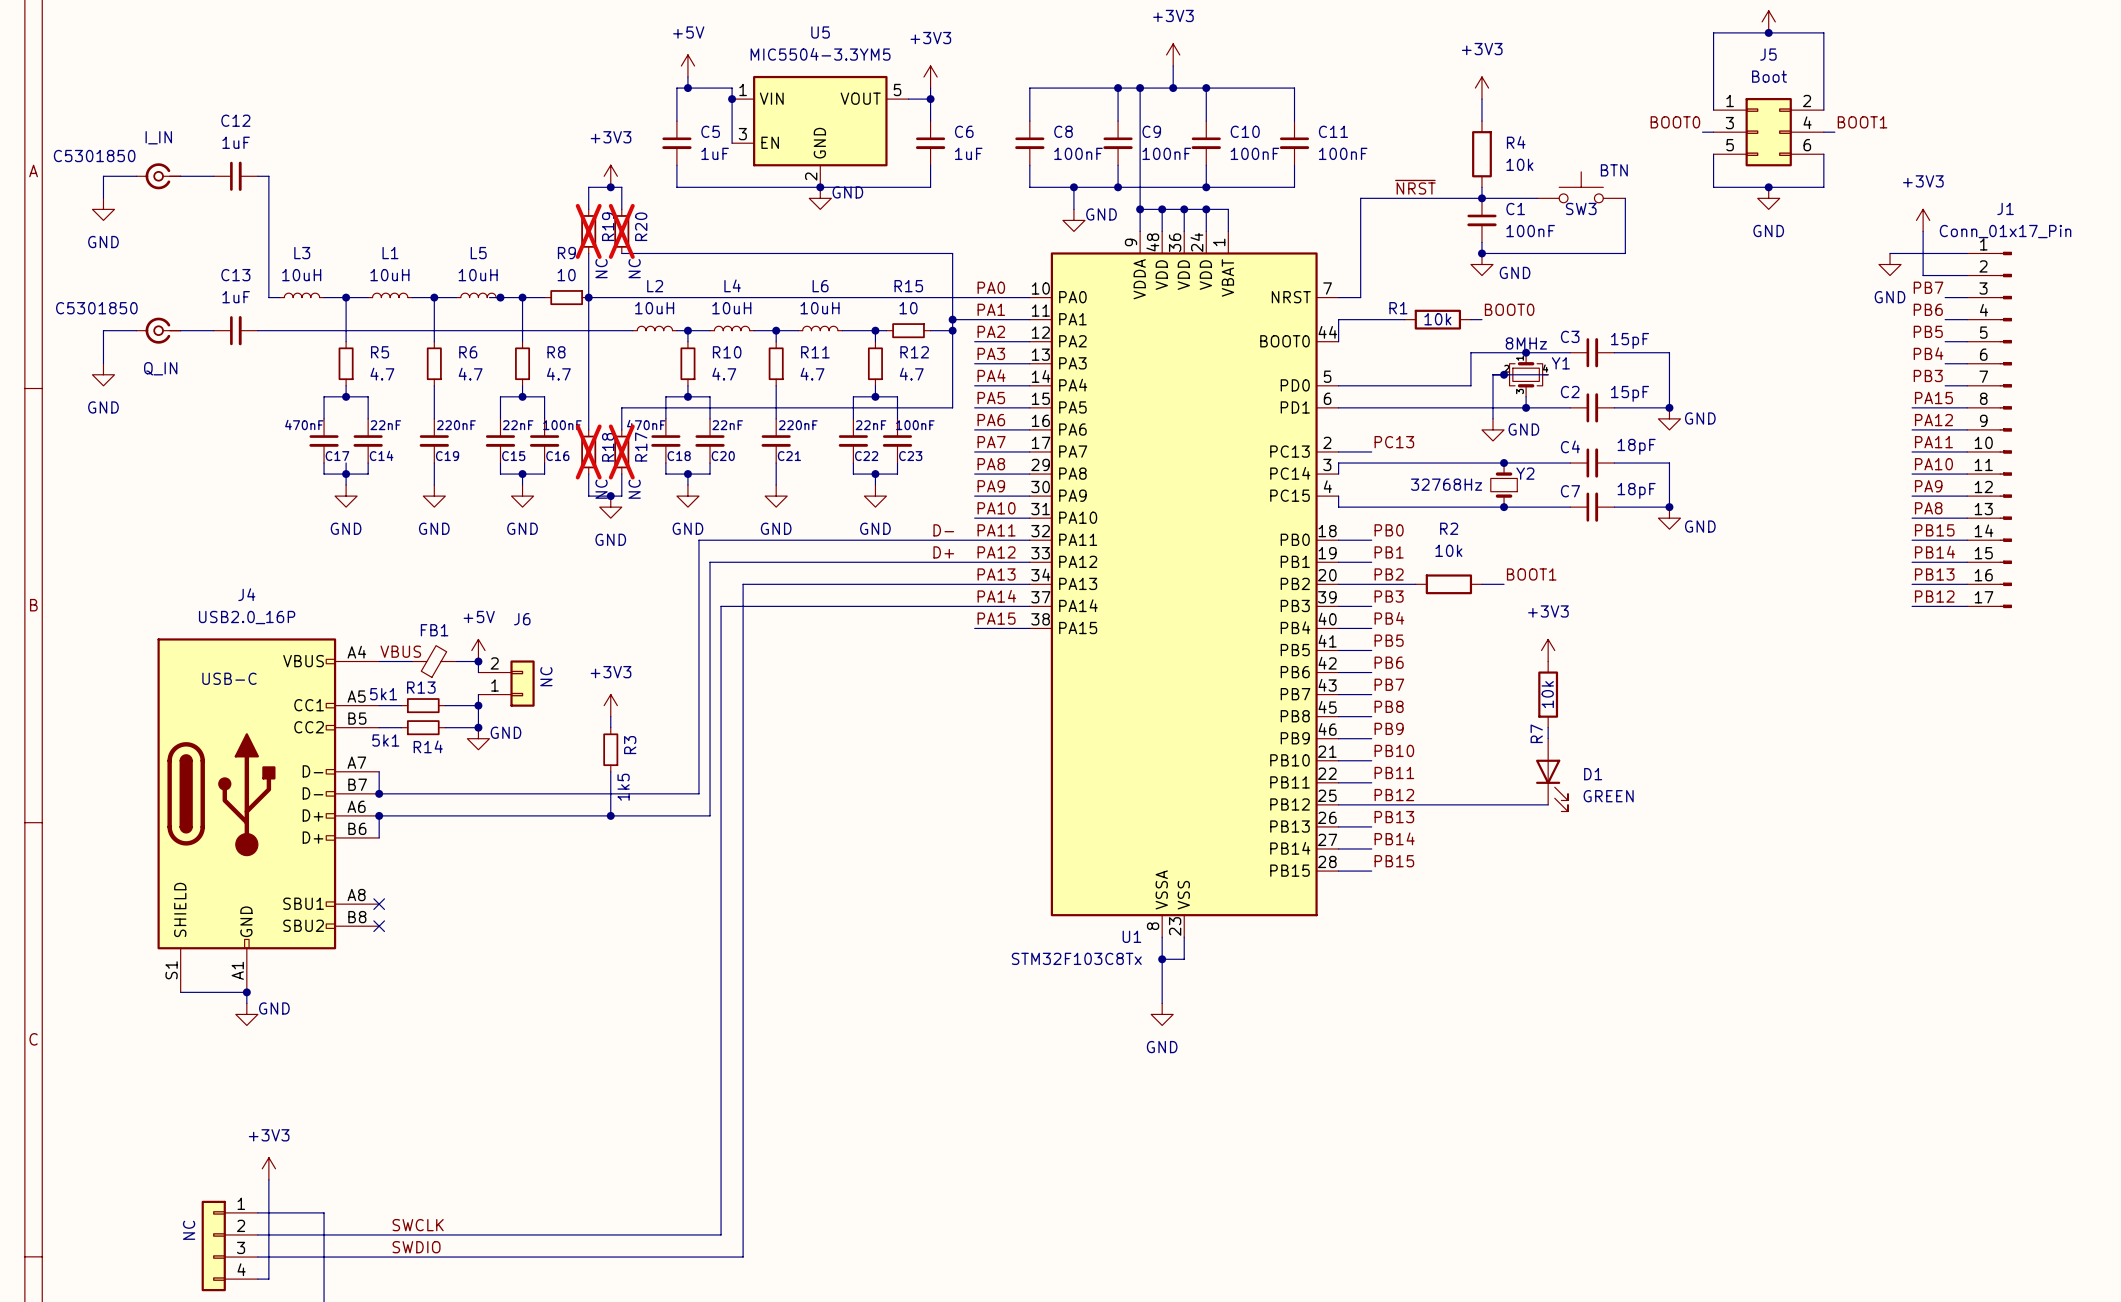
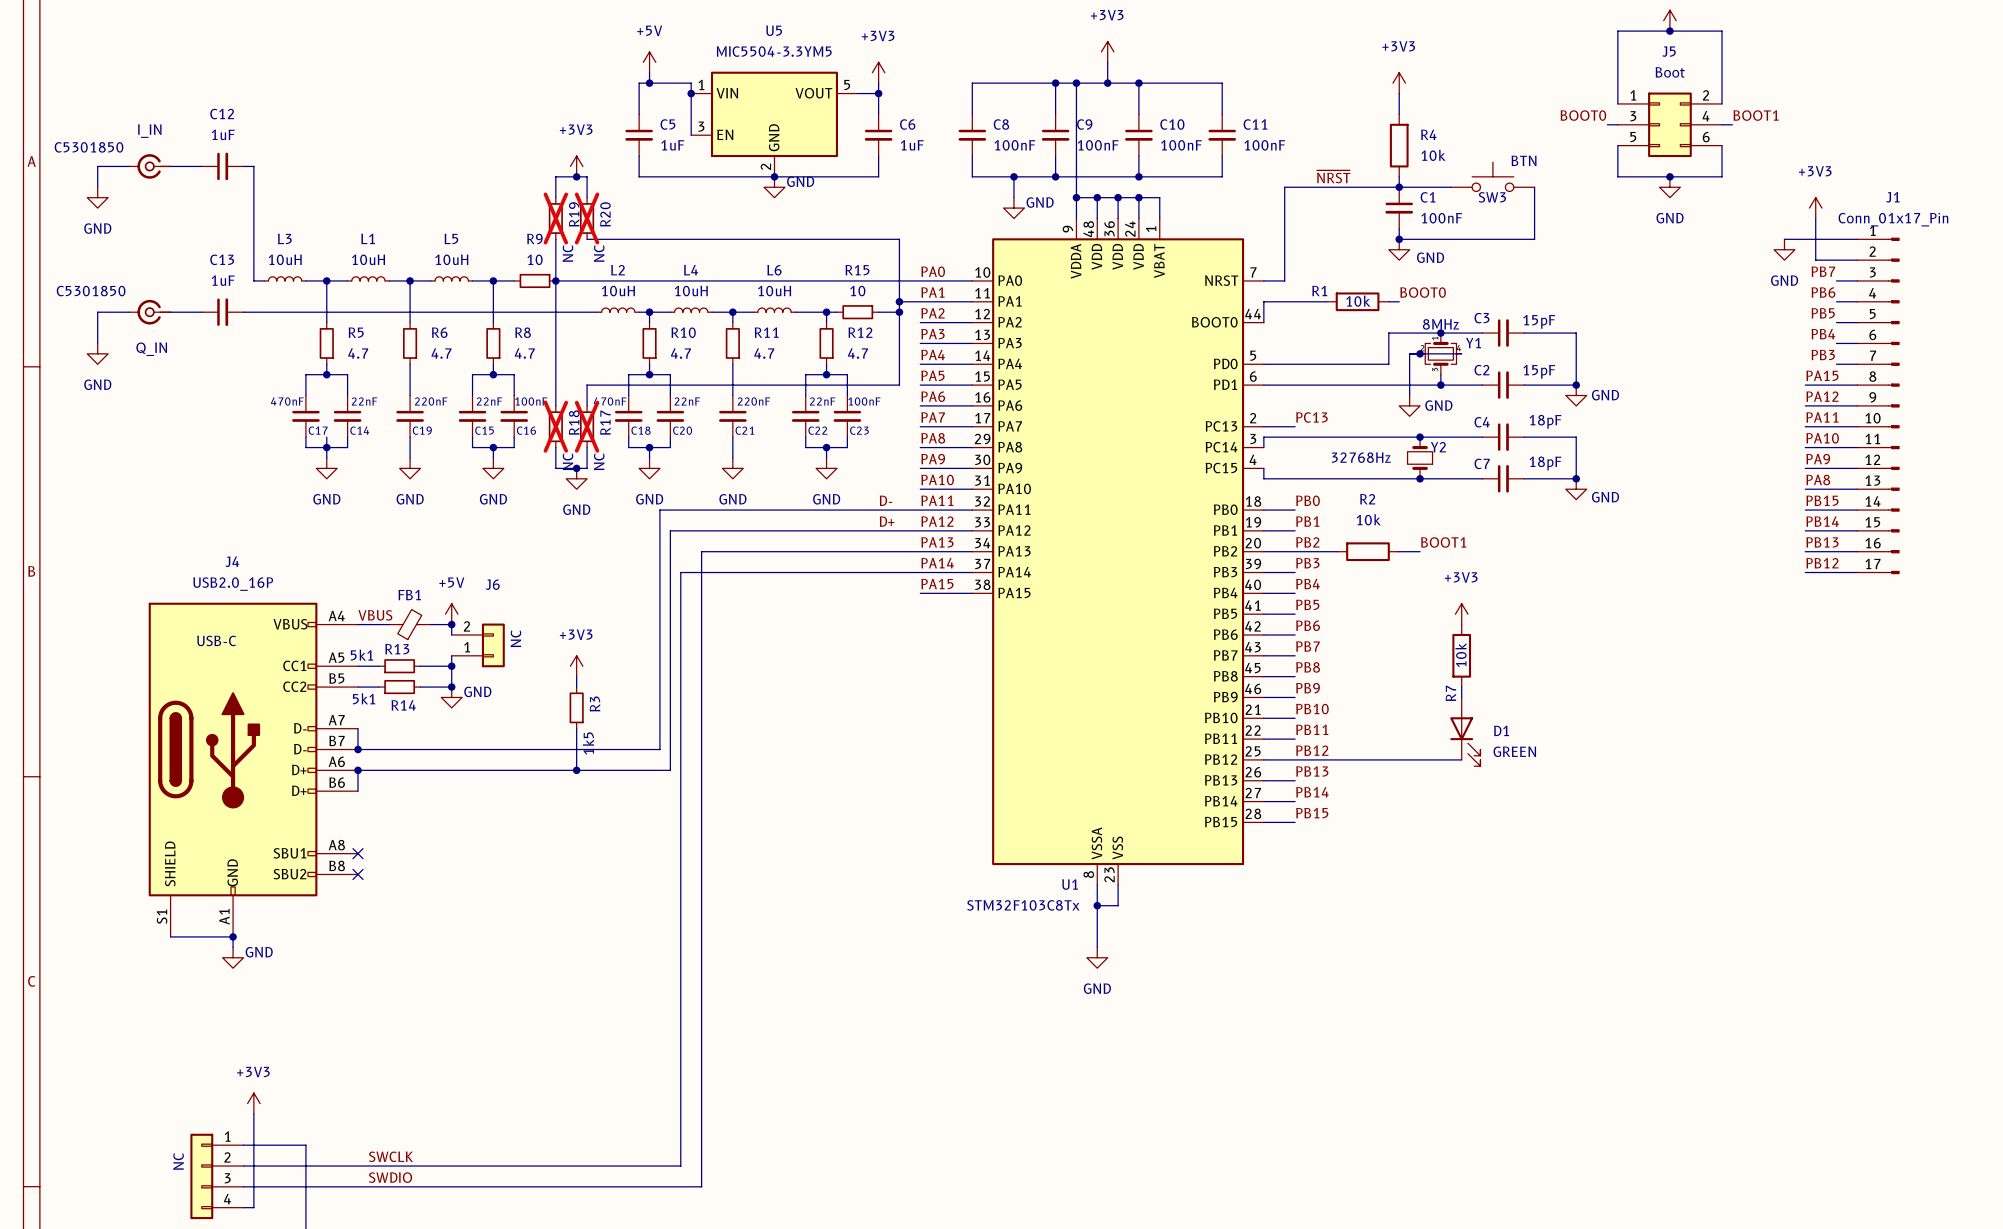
wire: (489, 297) (500, 297) -> none
junction: (500, 297) -> none

